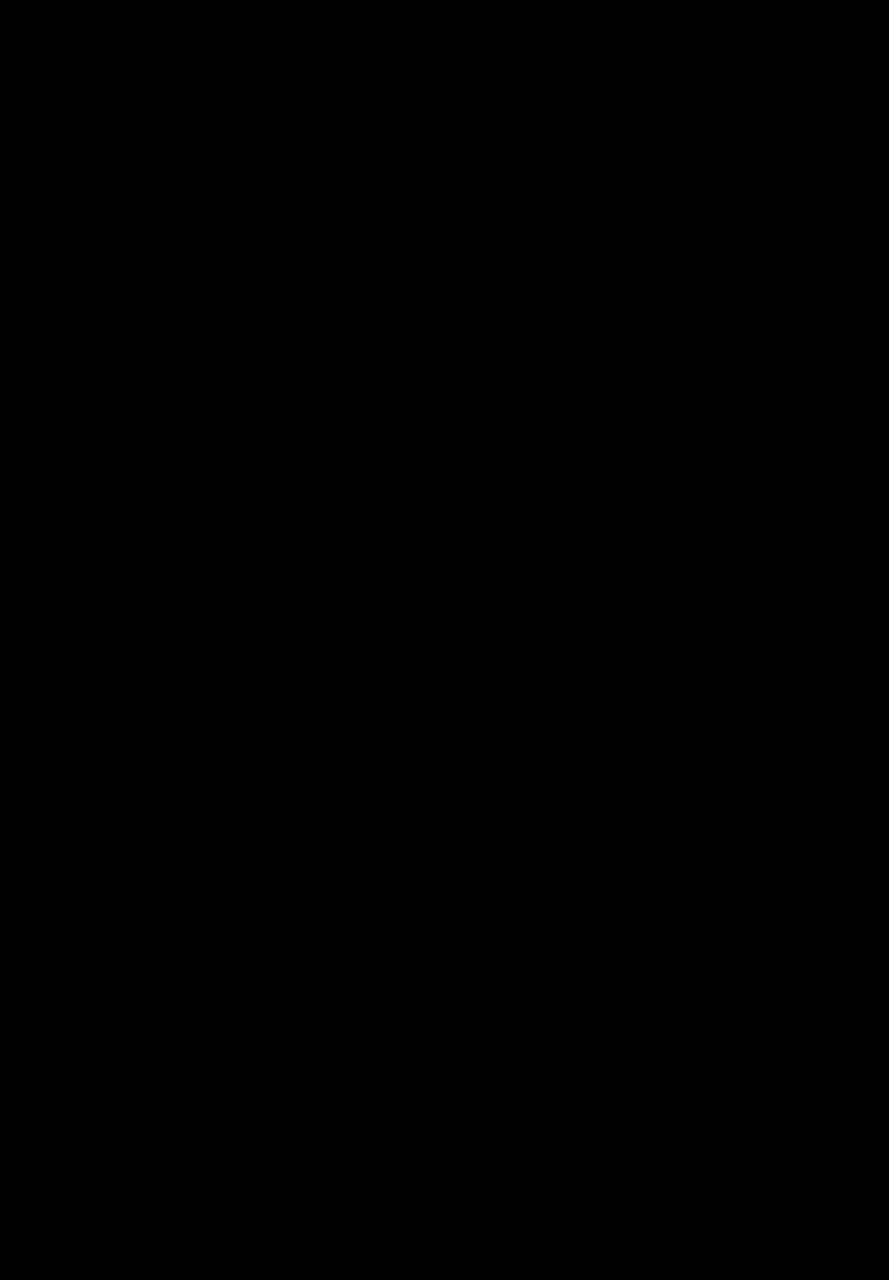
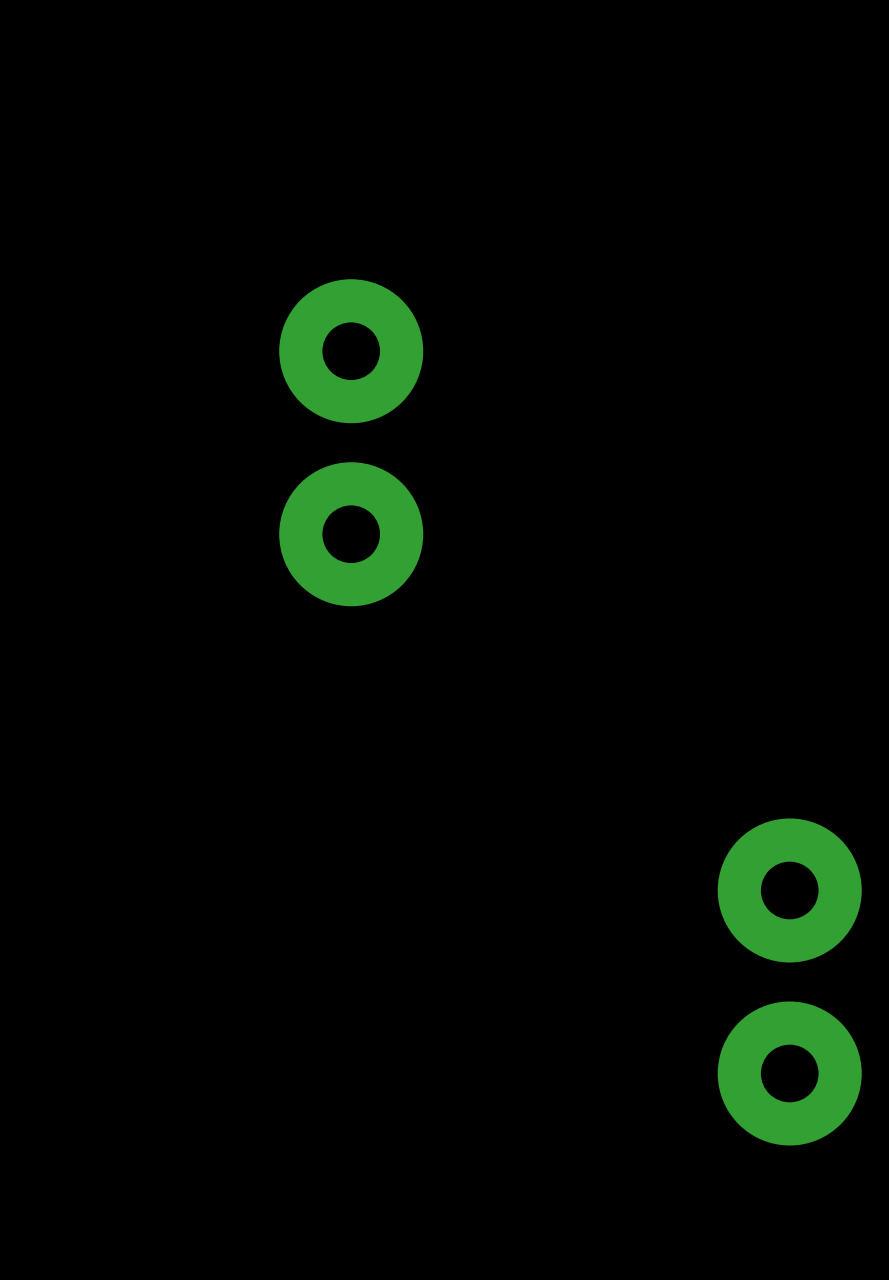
part: none -> (351, 442)
part: none -> (789, 981)

